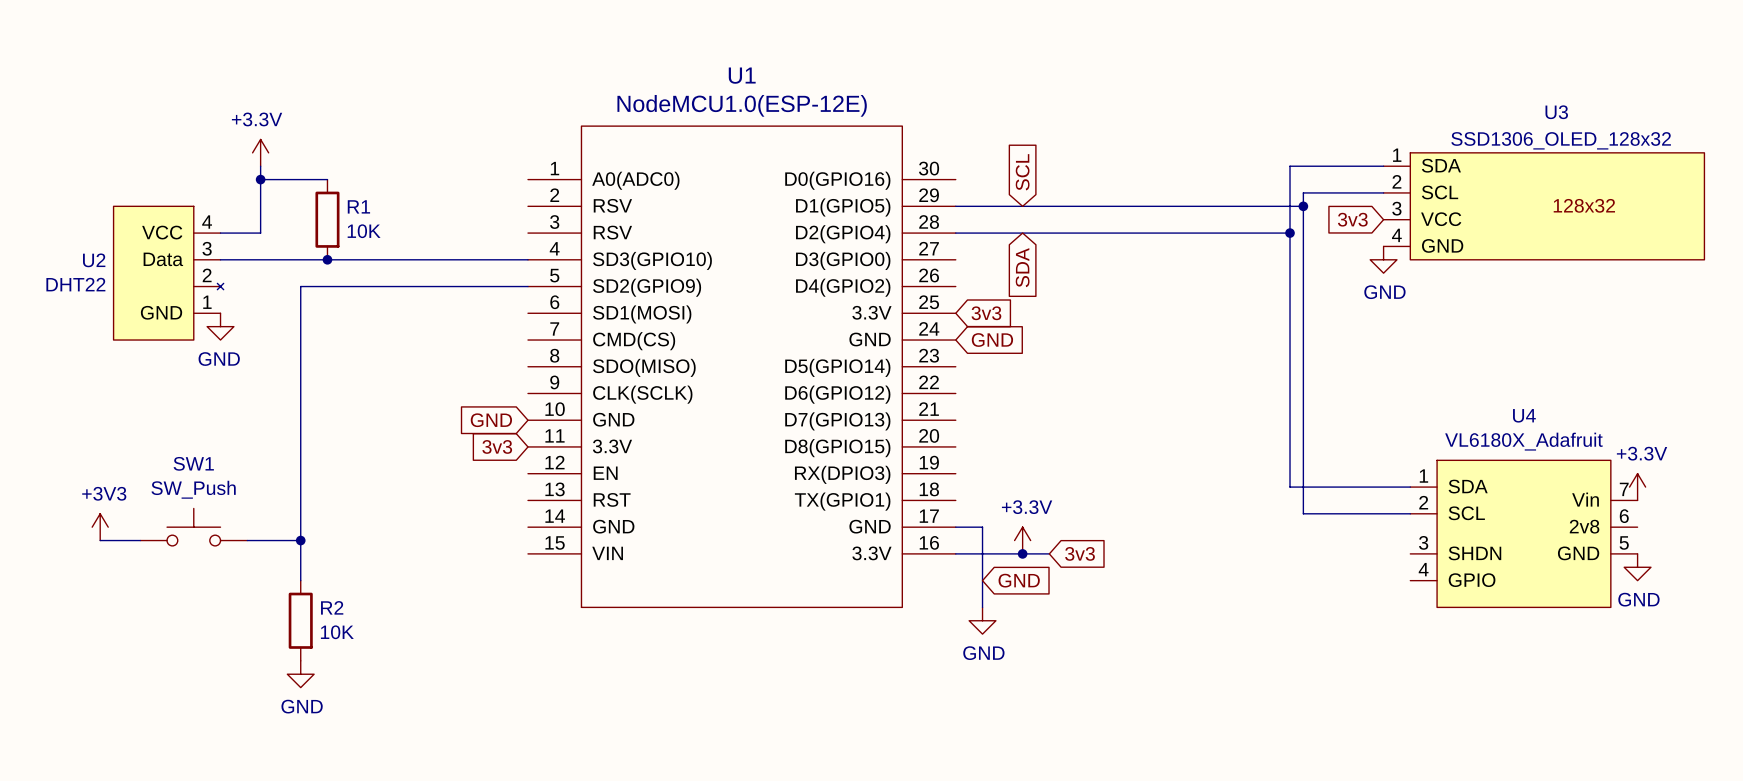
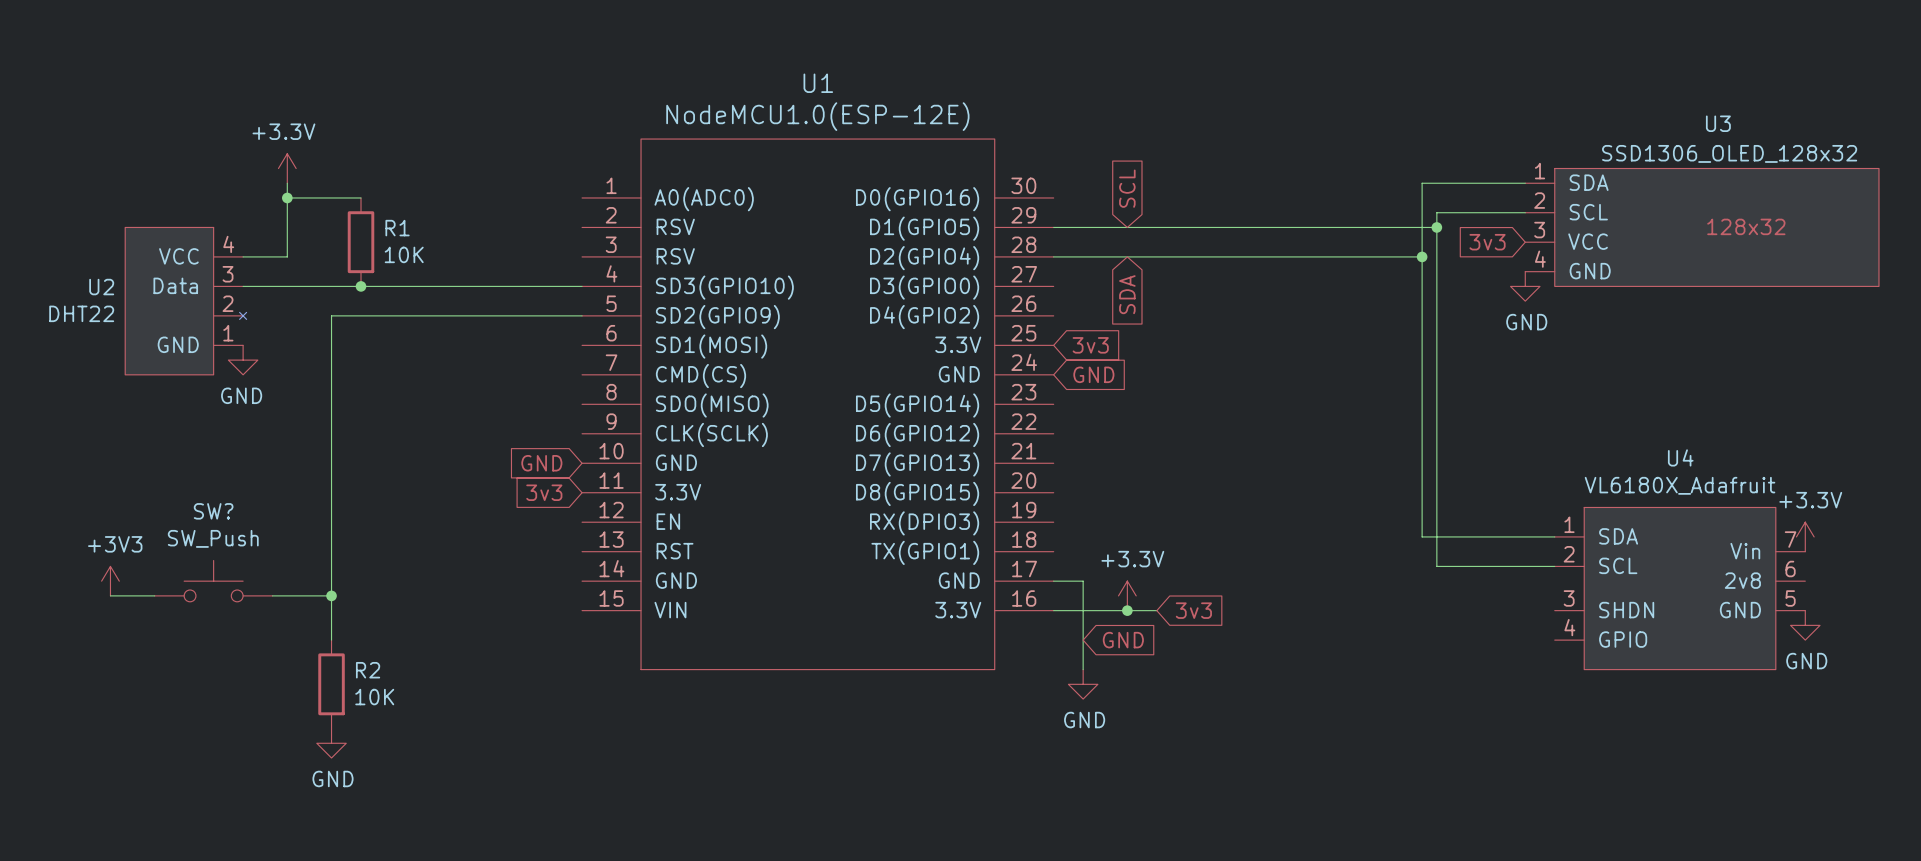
SW1 name: SW1 (193, 463) -> SW? (213, 511)

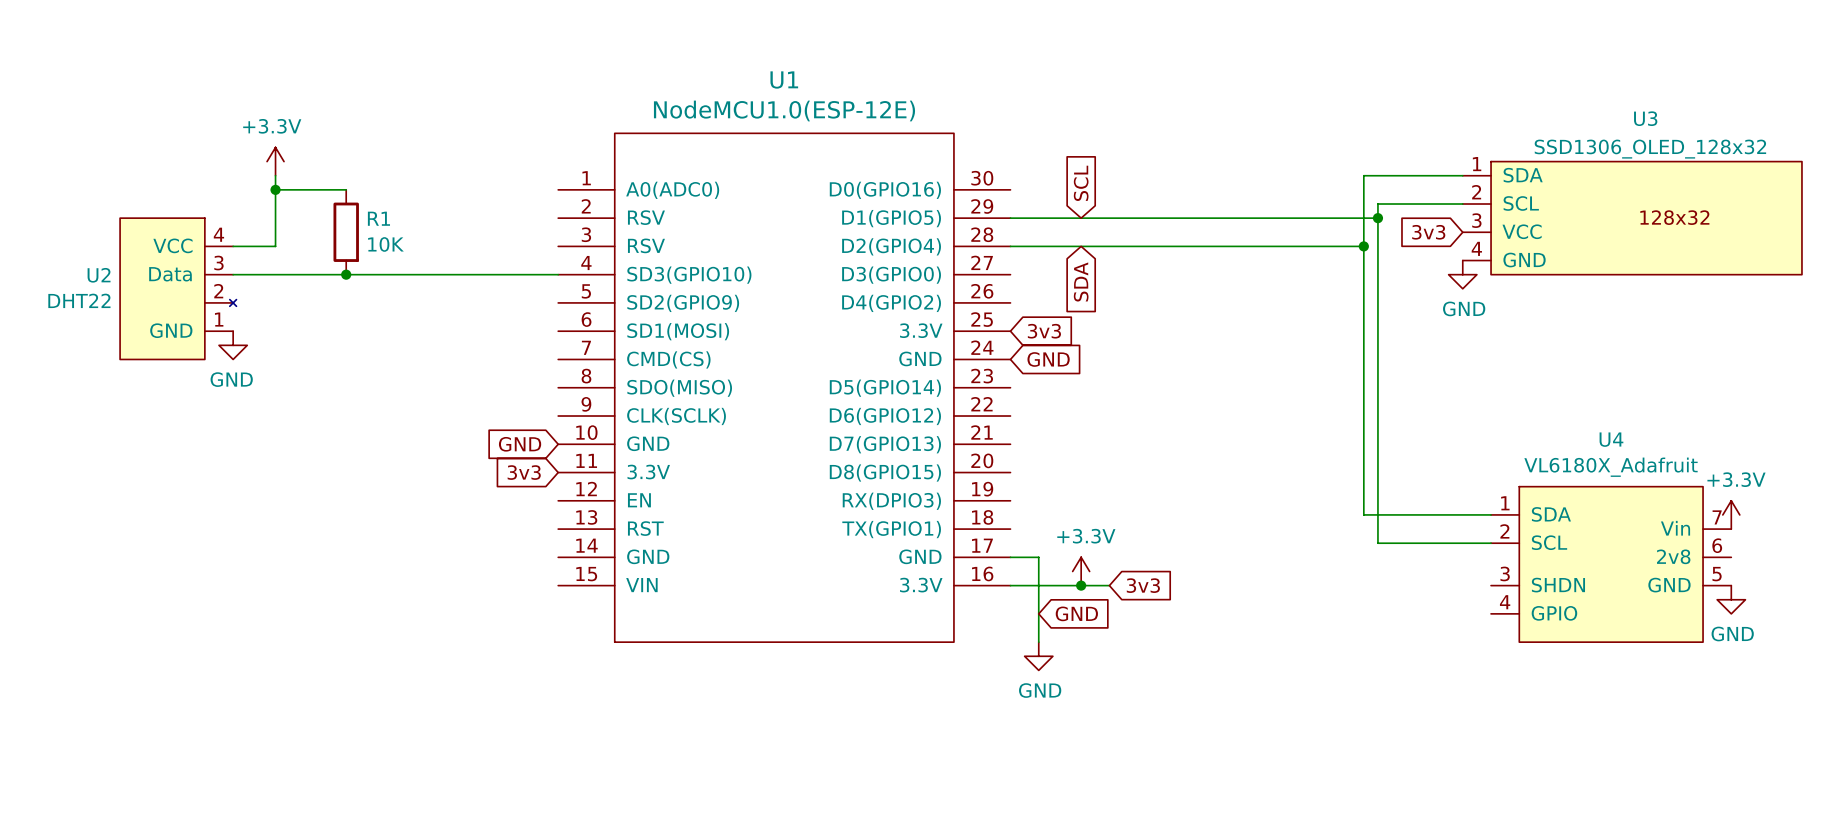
wire: (582, 315) (331, 315) (331, 640) -> none
power symbol: +3V3 (110, 581) -> none
SW?: SW_Push (213, 581) -> none
wire: (110, 595) (154, 595) -> none
wire: (272, 595) (331, 595) -> none
junction: (331, 595) -> none
R2: 10K (331, 684) -> none
power symbol: GND (331, 743) -> none

